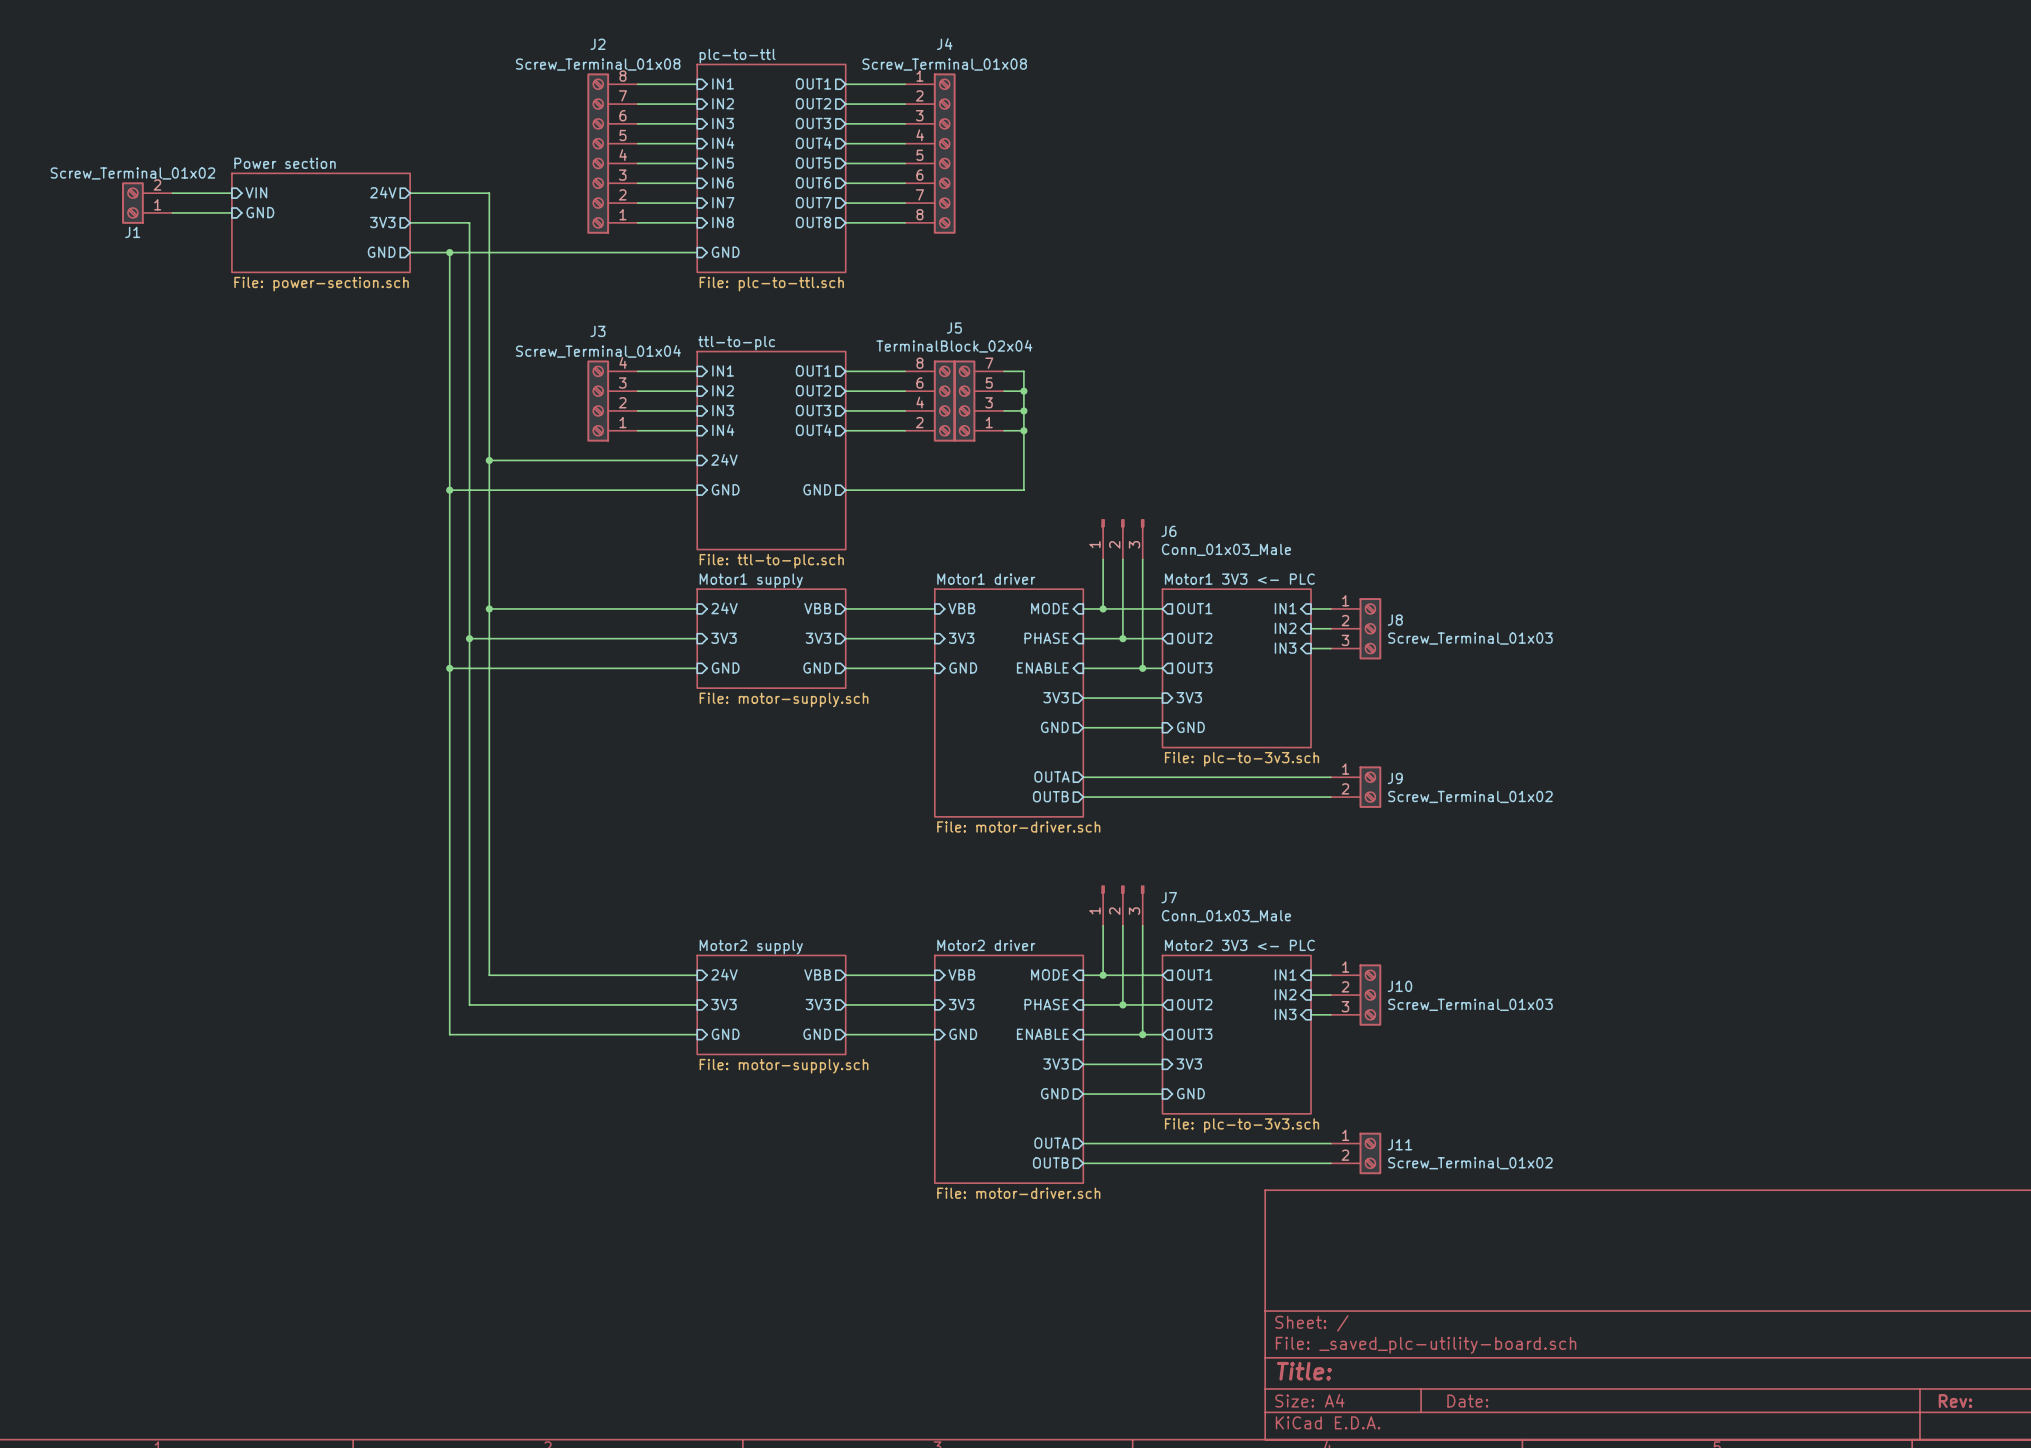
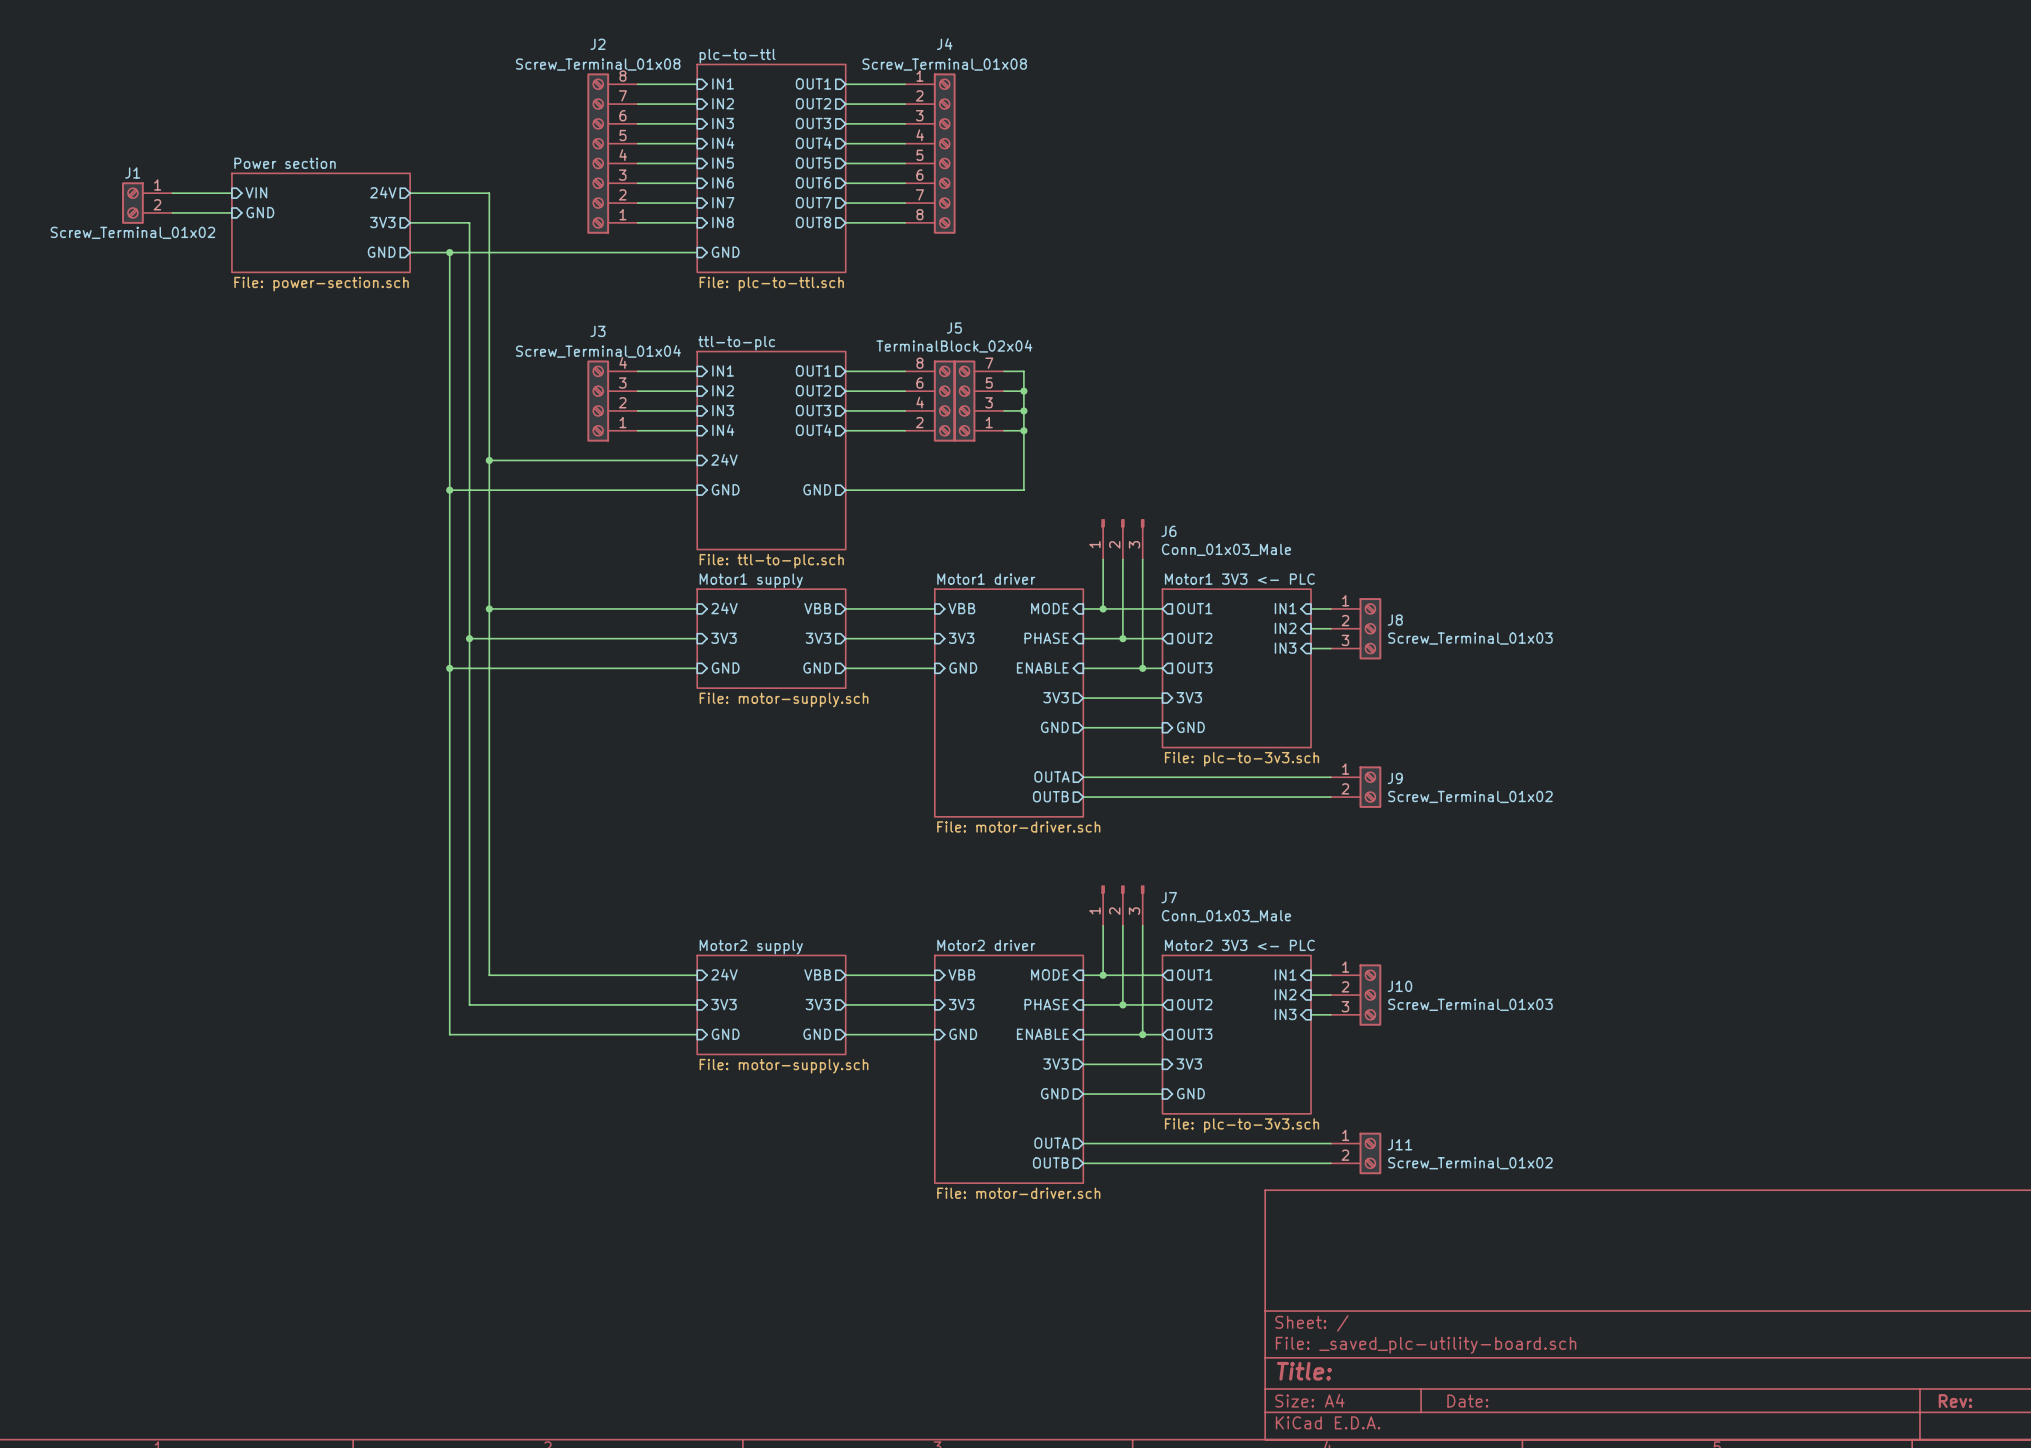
J1 flip: as is (132, 203) -> up-down (132, 203)

